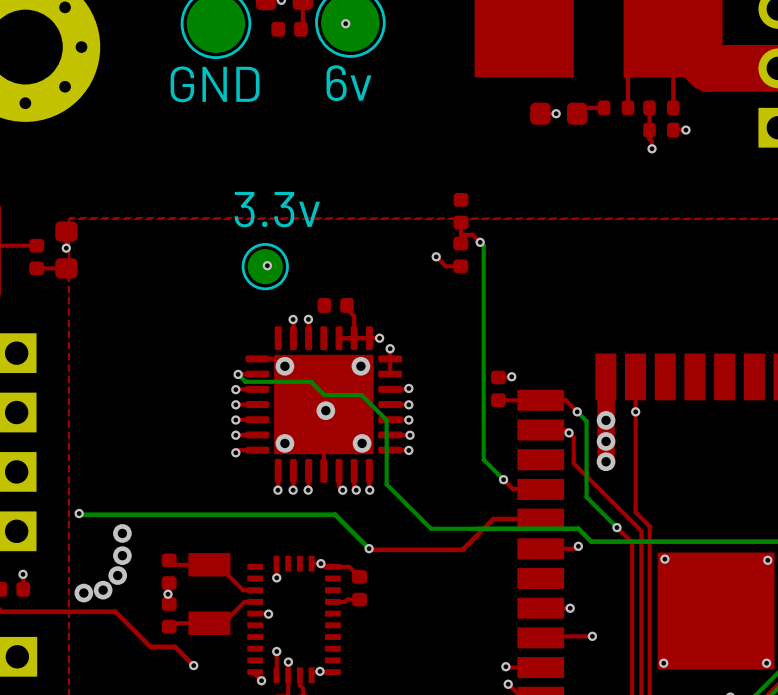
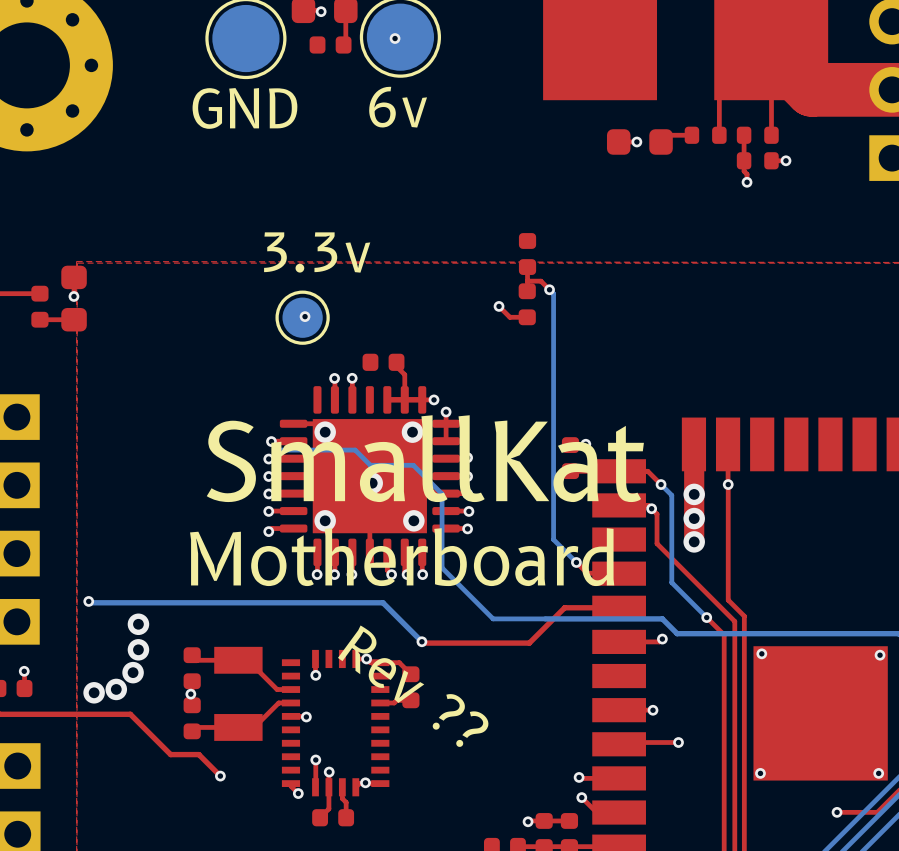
text: none -> SmallKat (425, 458)
text: none -> Motherboard (402, 557)
text: none -> Rev ?? (413, 686)

